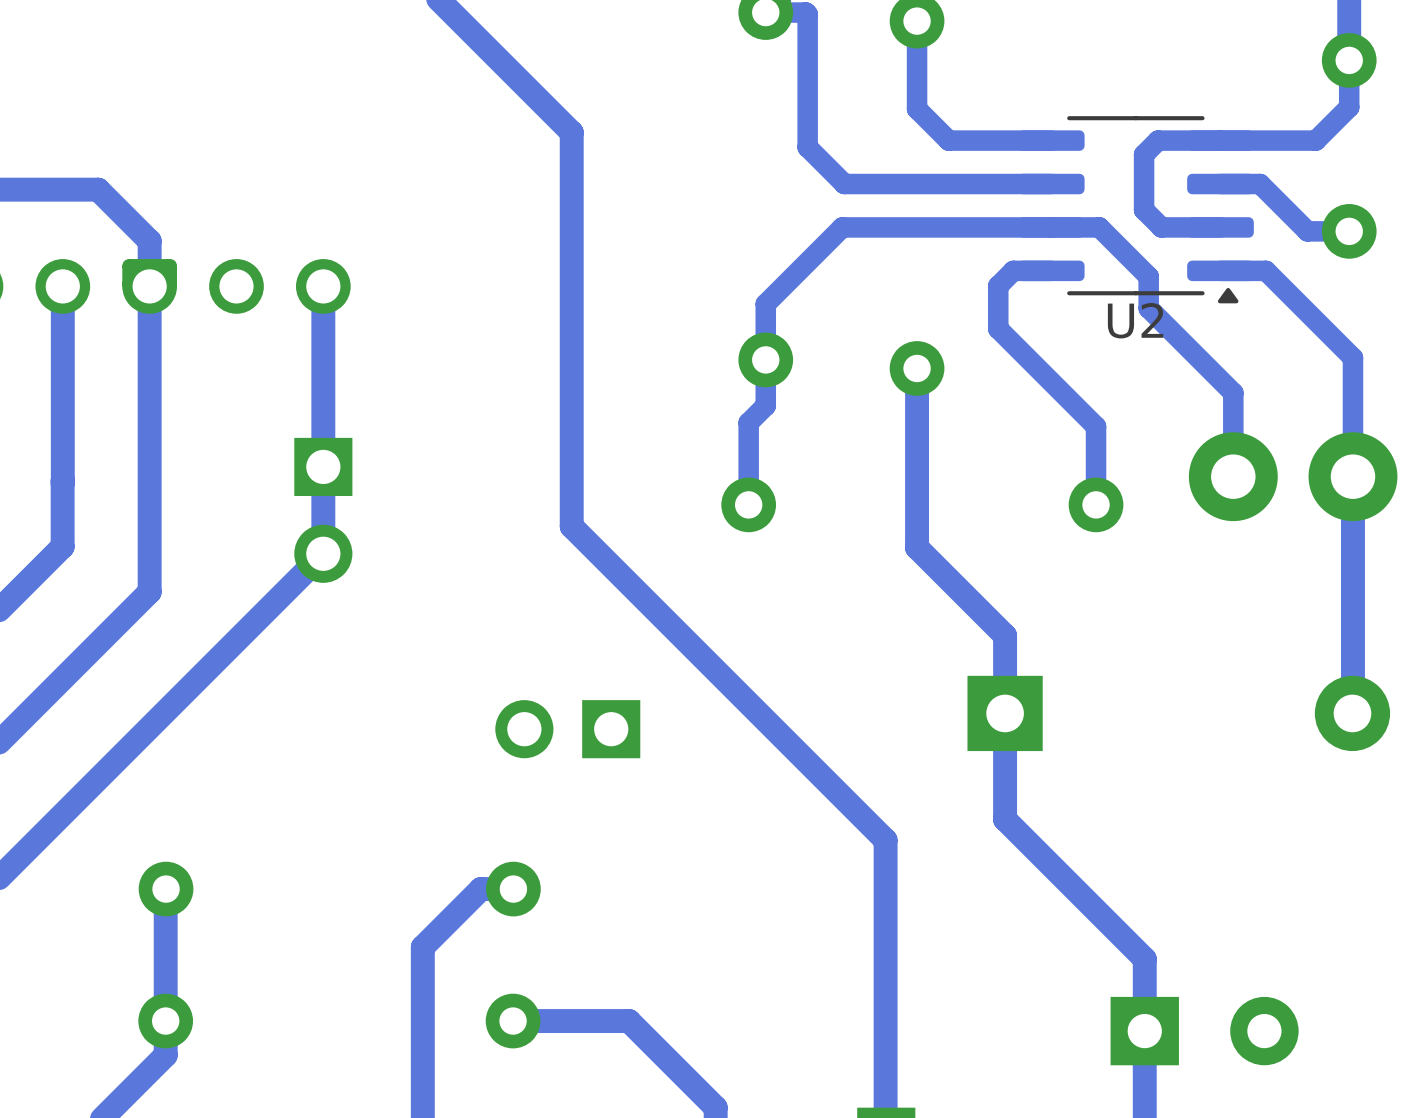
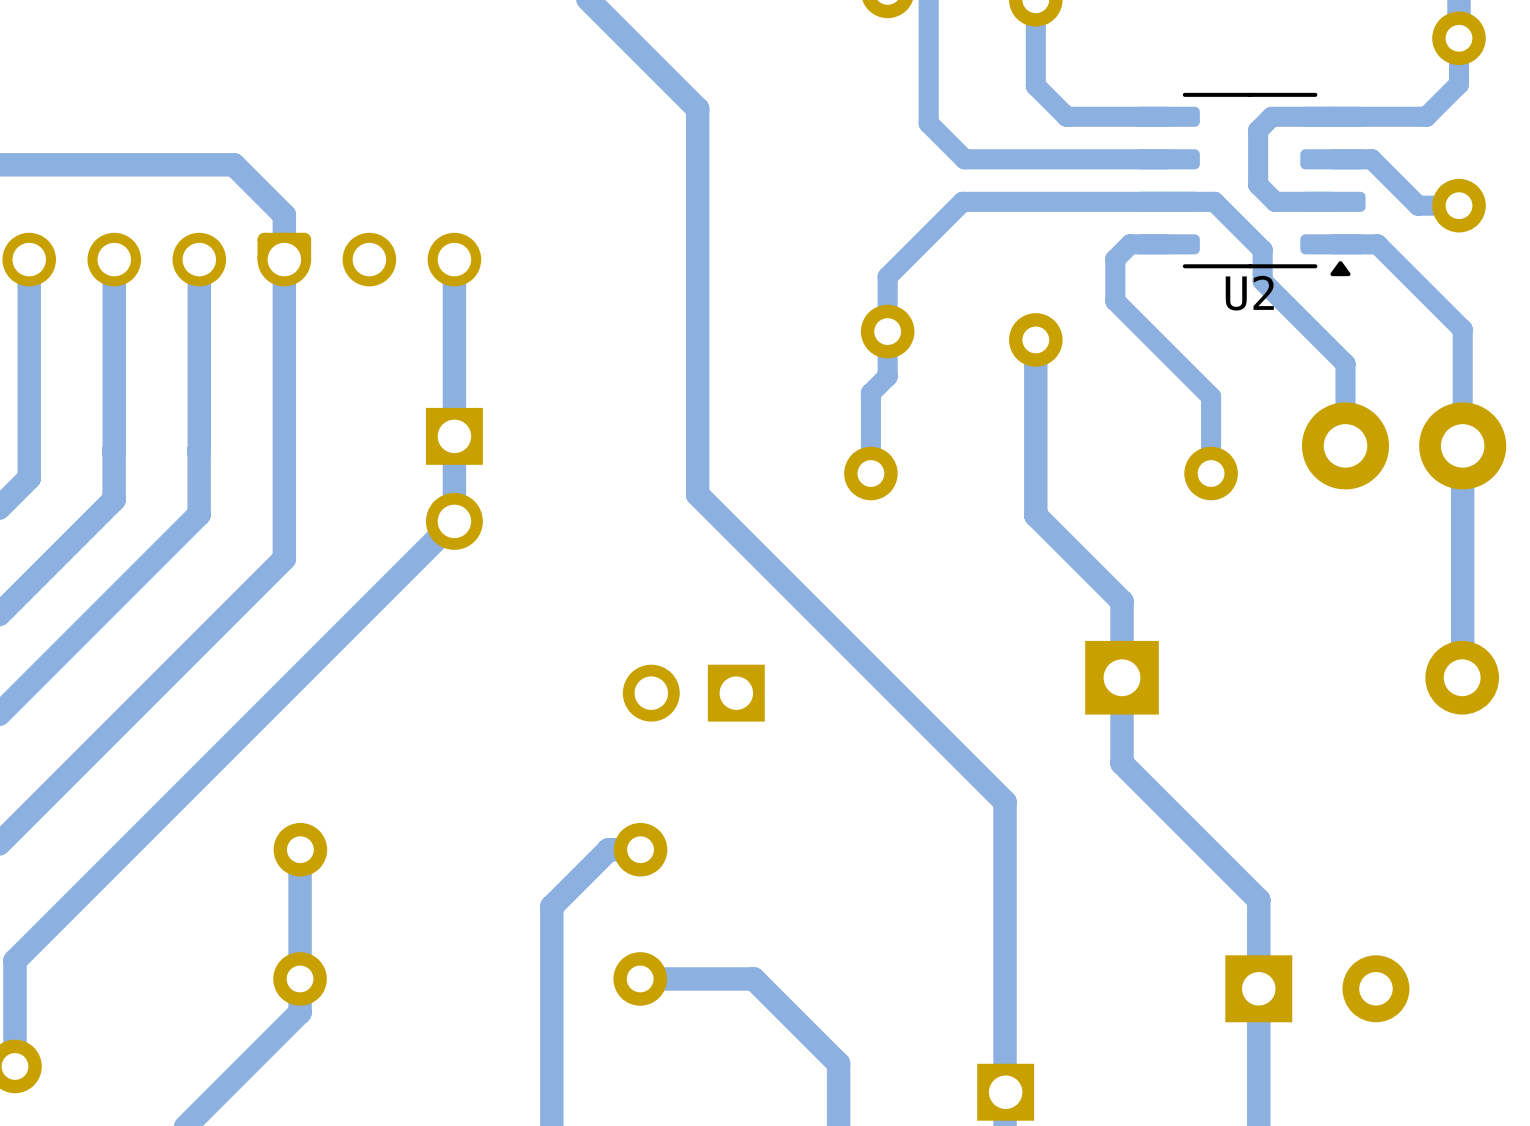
bottom track: (1005, 800) (1005, 819) (1144, 959) -> (1122, 763) (1258, 900) (1258, 918)

